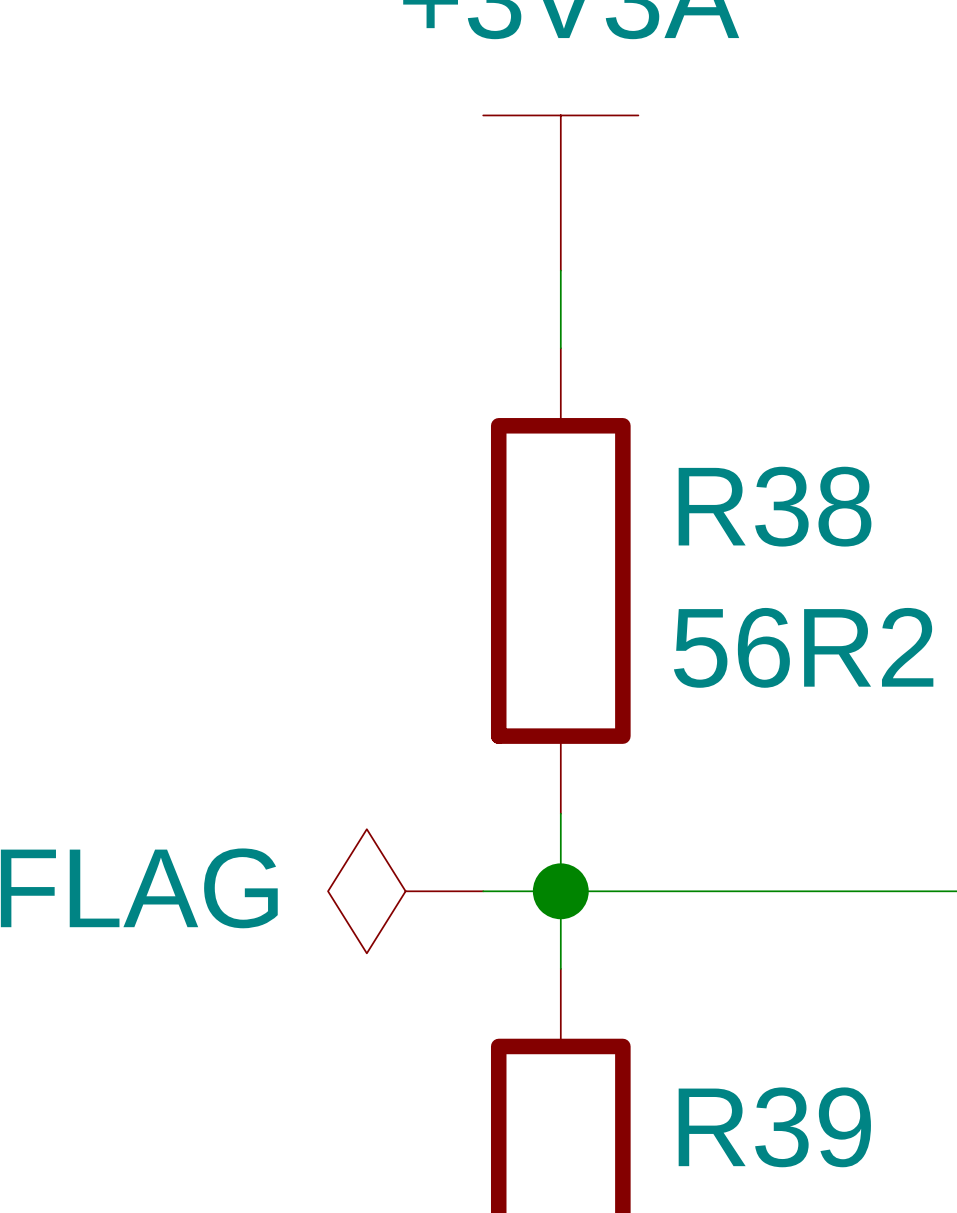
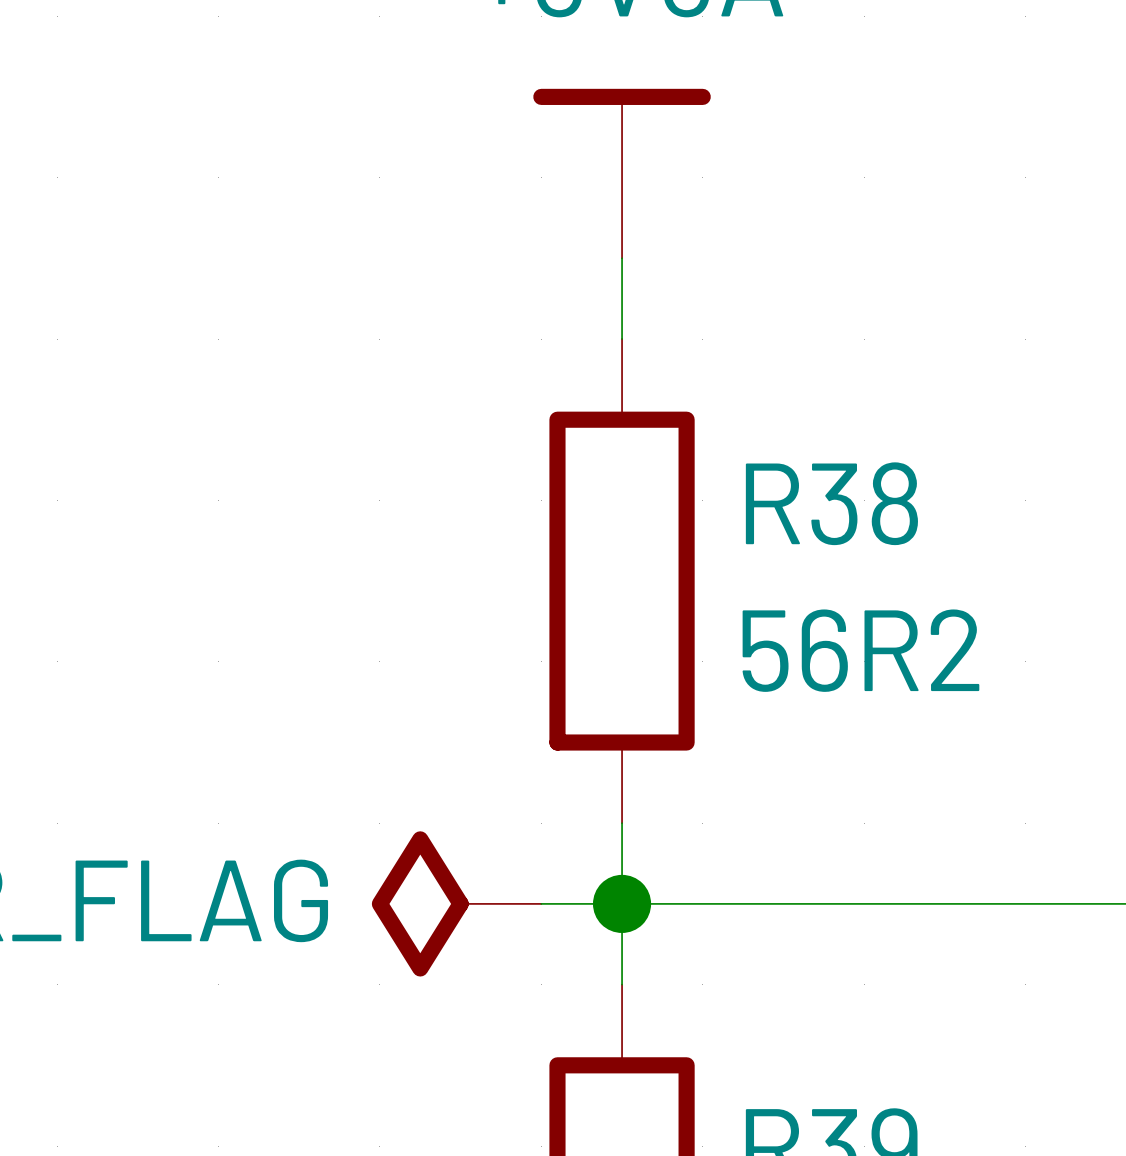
power symbol shape: [483, 115, 639, 271] -> [533, 88, 711, 259]
power symbol shape: [328, 829, 484, 954] -> [371, 831, 542, 977]

